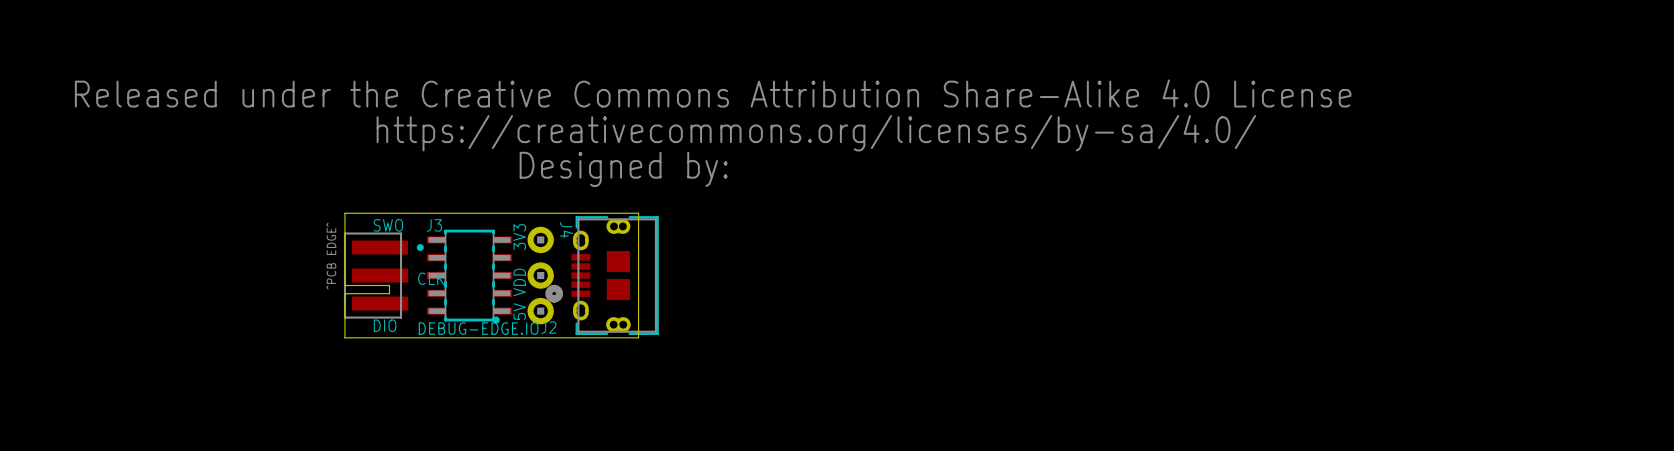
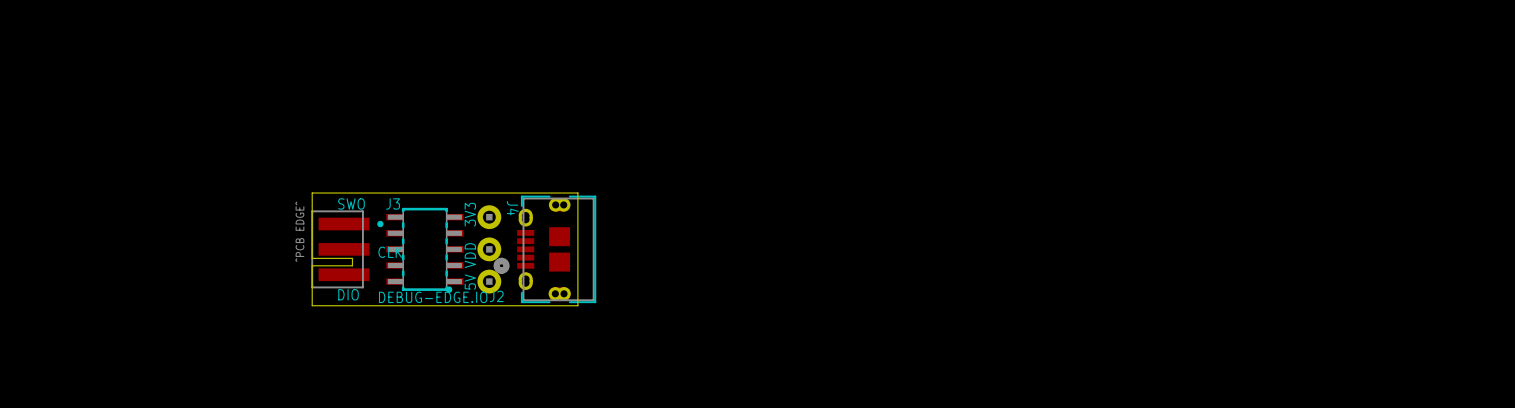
drawing: [74, 79, 1352, 187] -> none

